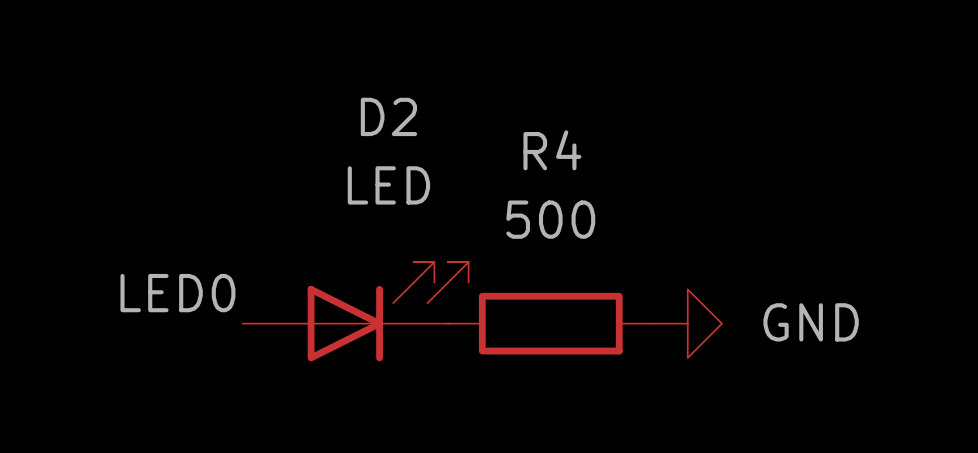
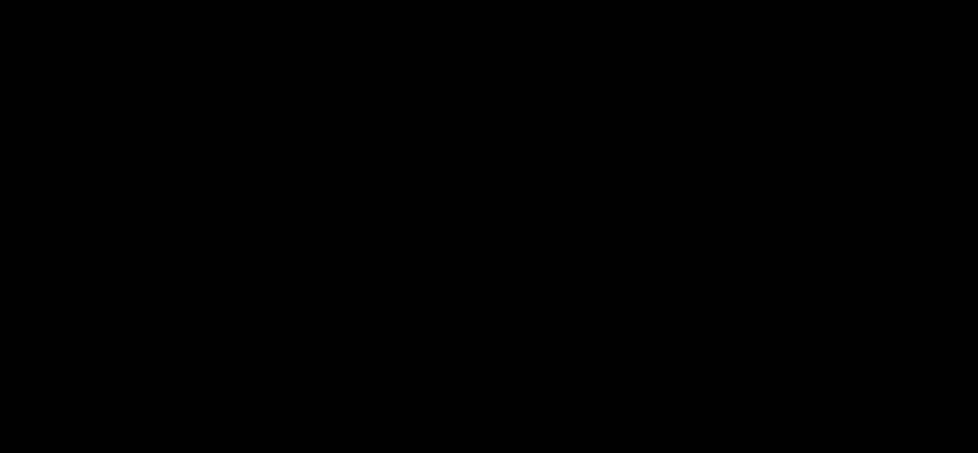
label: LED0 (177, 293) -> none
D2: LED (355, 311) -> none
R4: 500 (550, 323) -> none
power symbol: GND (687, 323) -> none

